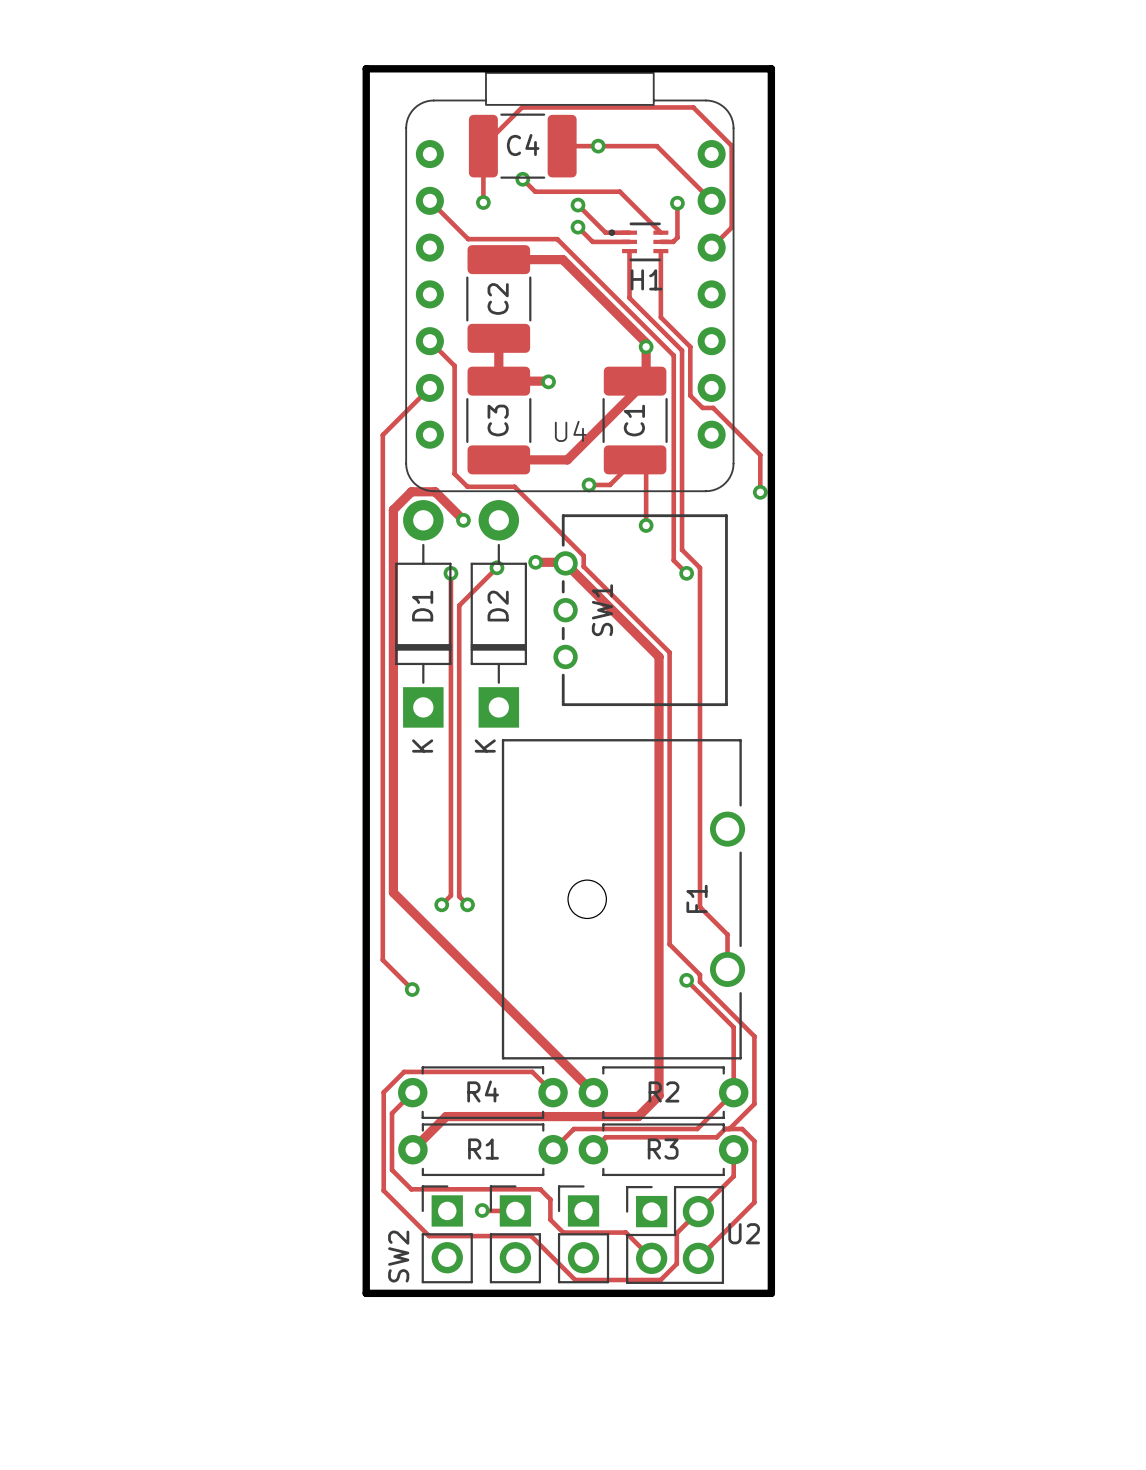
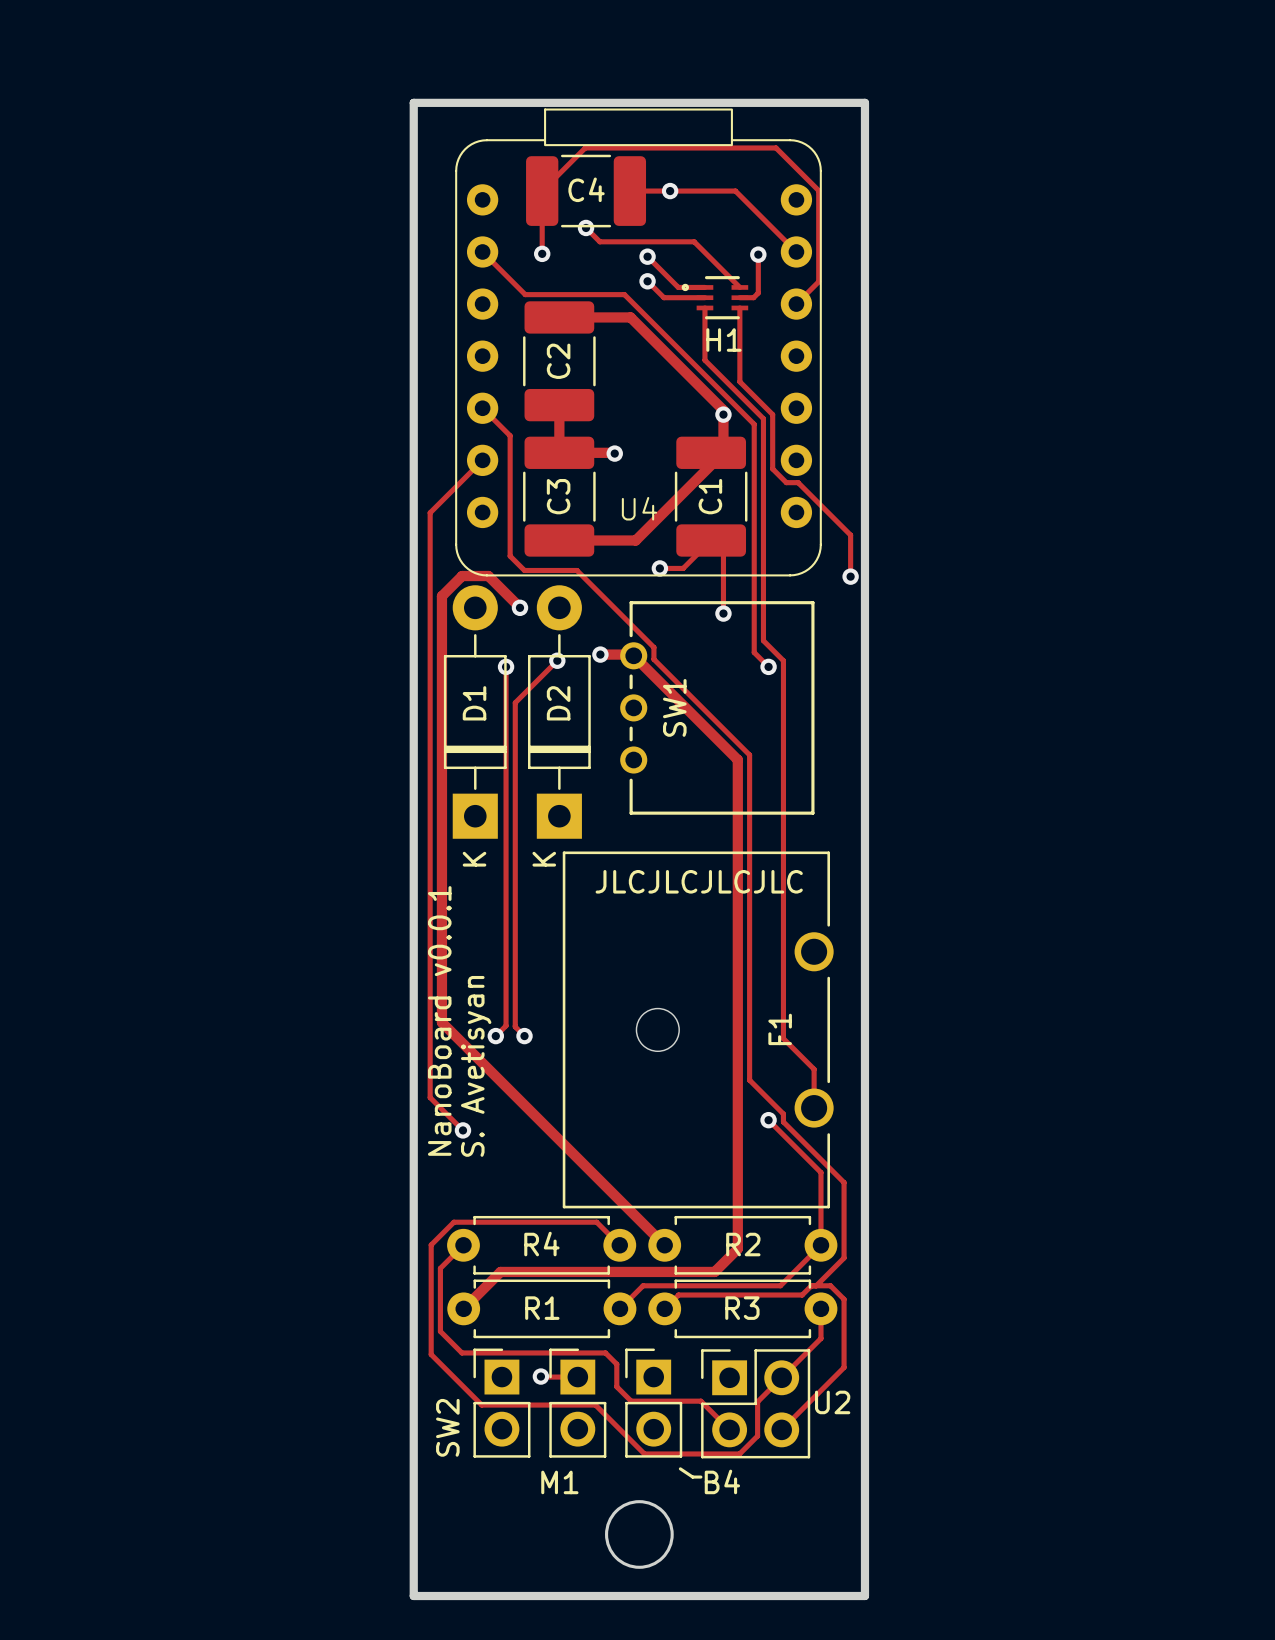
board edge: (366, 68) (771, 68) (771, 1293) (366, 1293) (366, 68) -> (413, 102) (413, 1596) (864, 1596) (864, 102) (413, 102)
text: none -> JLCJLCJLCJLC (699, 881)
text: none -> NanoBoard v0.0.1 (439, 1020)
text: none -> S. Avetisyan (476, 1066)
line: none -> (680, 1468) (692, 1477) (700, 1477)
M1 name: none -> M1 (559, 1482)
B4 name: none -> B4 (722, 1481)
round board edge: none -> [605, 1500, 674, 1569]

